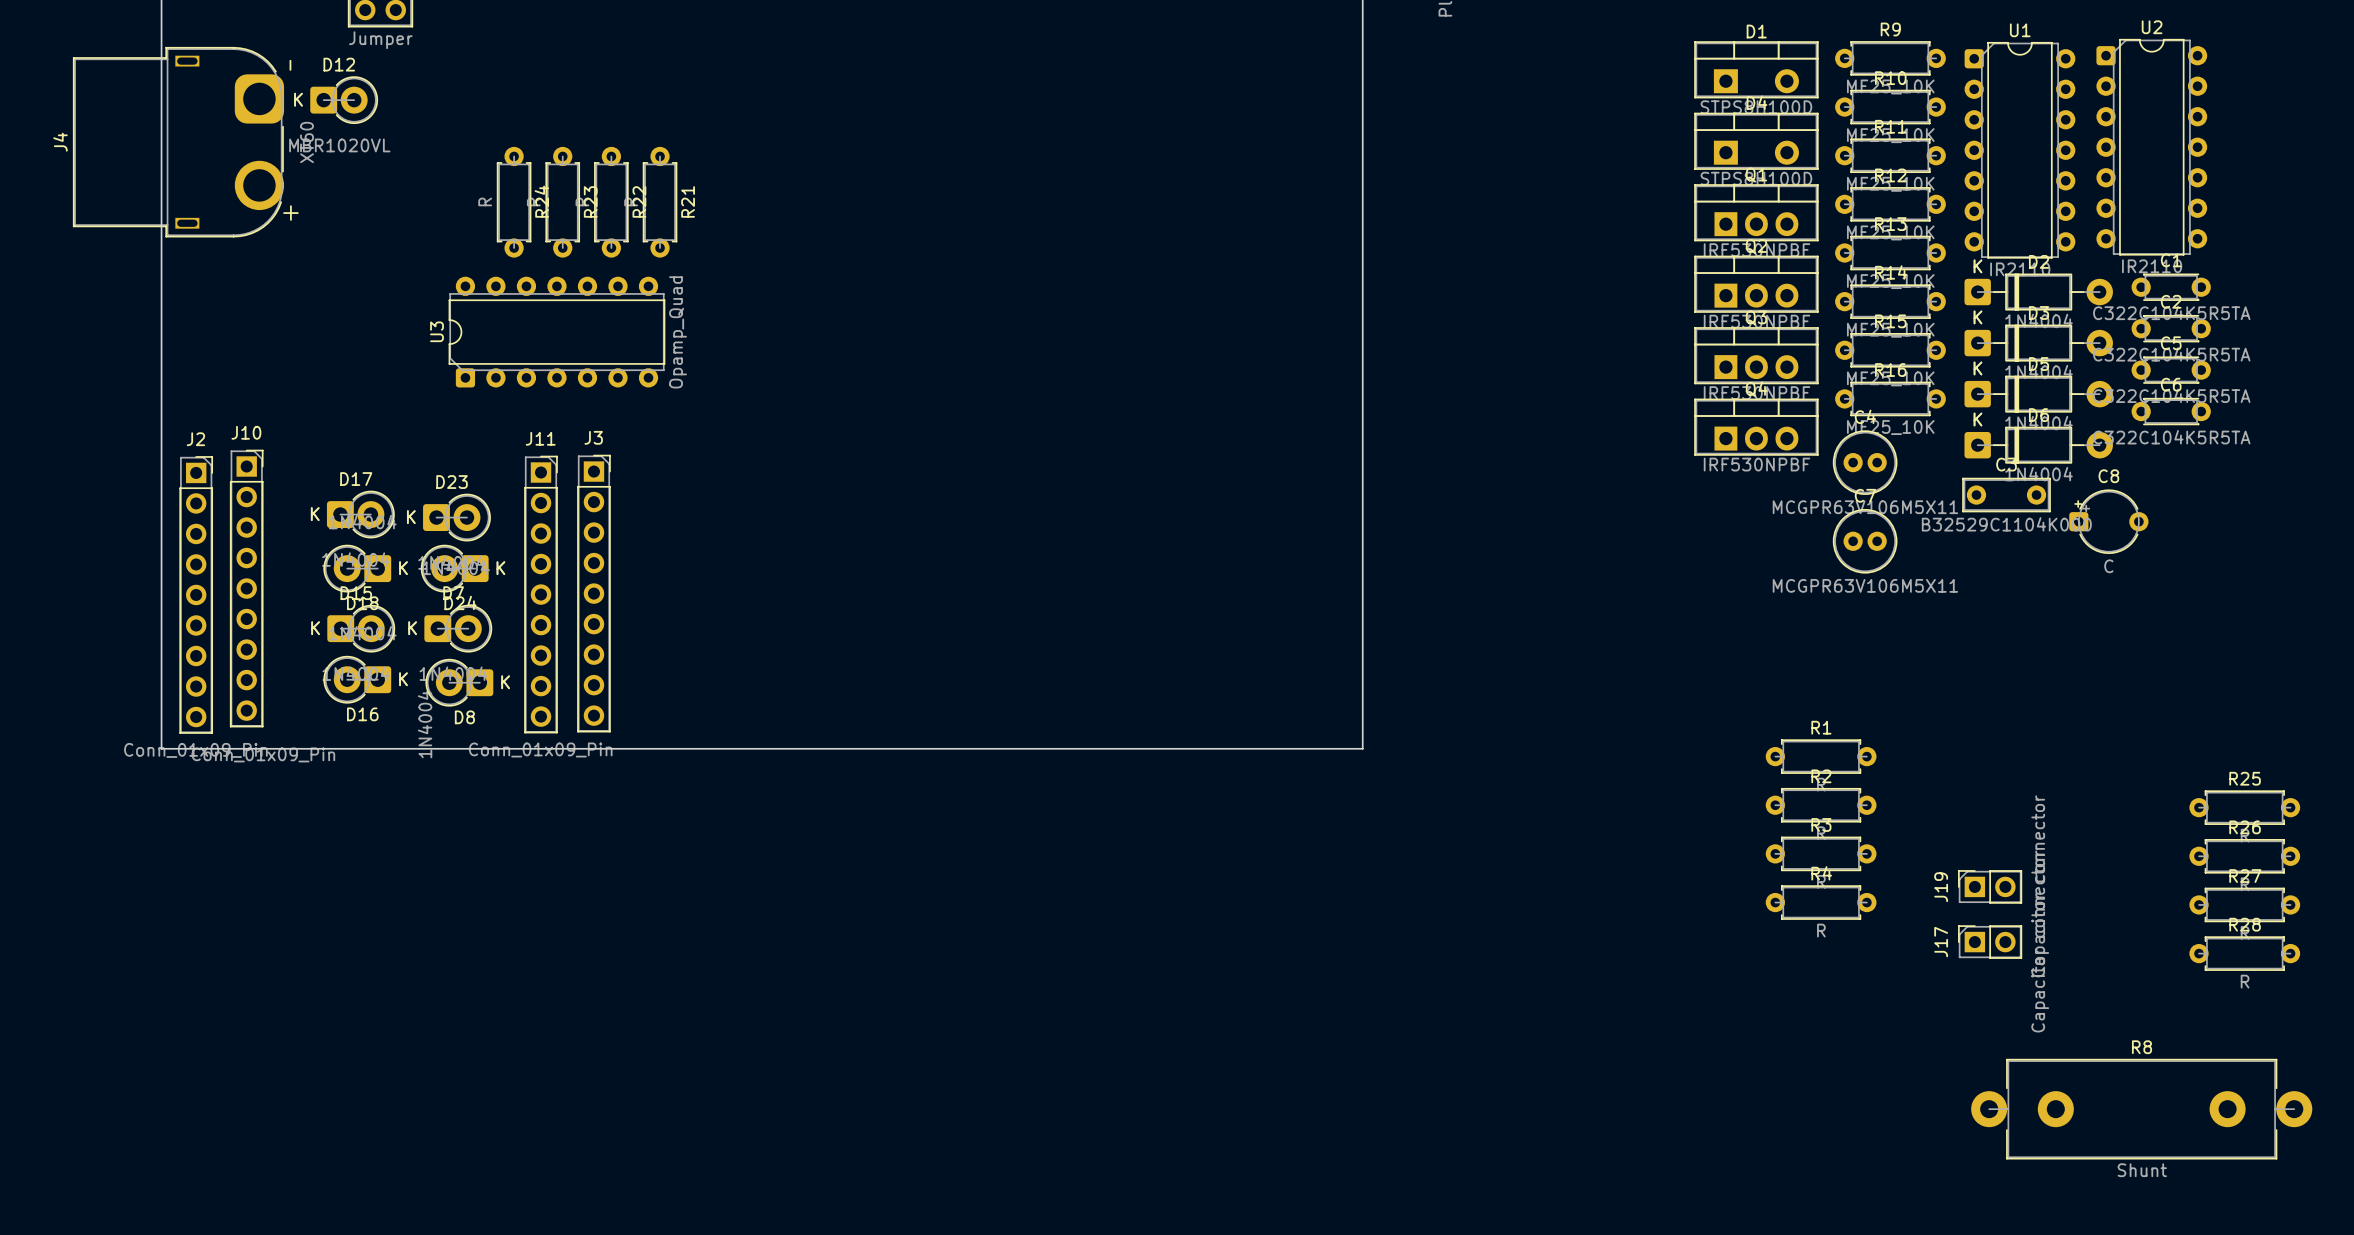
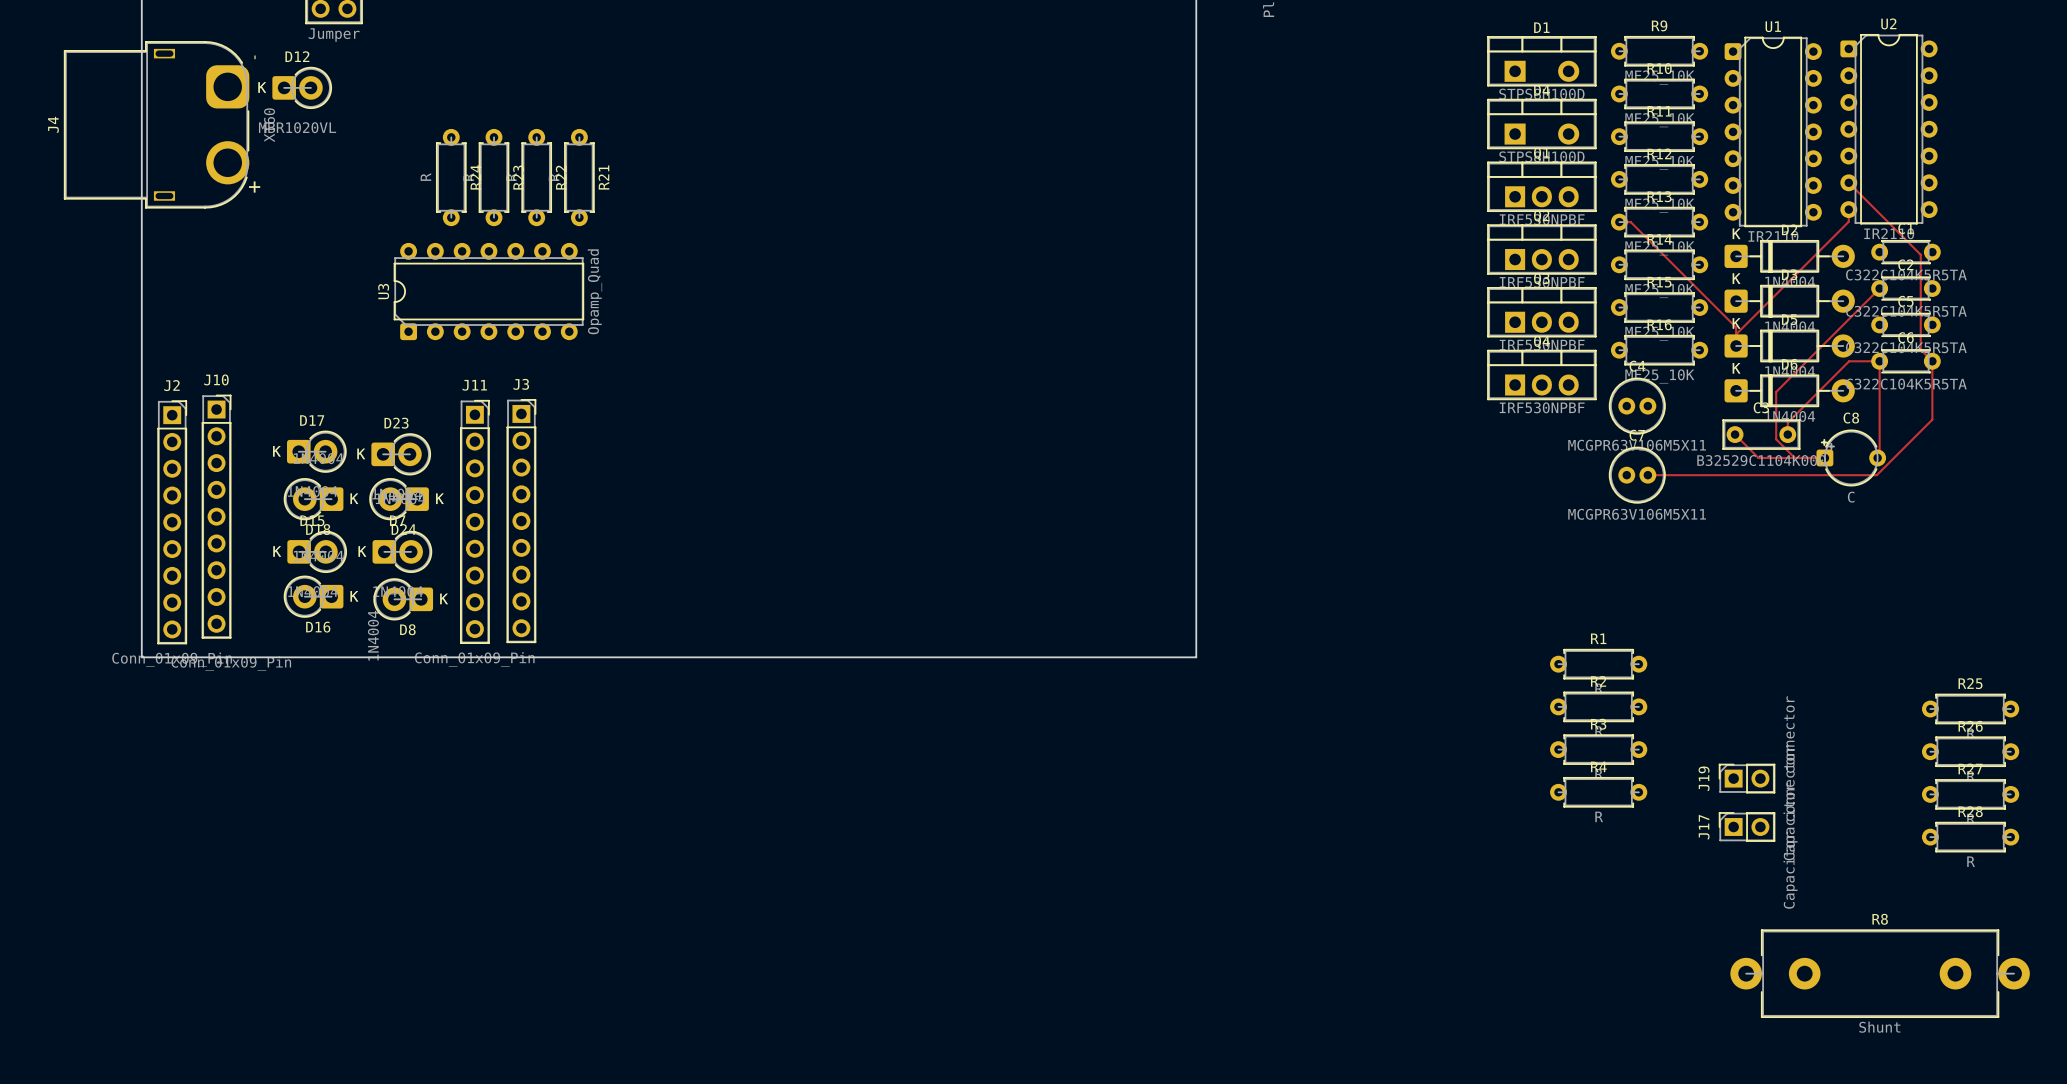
top track: none -> (1848, 182) (1920, 254) (1920, 349) (1932, 361) (1932, 419) (1876, 475) (1647, 475)
top track: none -> (1848, 209) (1848, 221) (1736, 334)
top track: none -> (1619, 222) (1630, 222) (1736, 327) (1736, 345)
top track: none -> (1879, 288) (1776, 391) (1776, 439) (1794, 457)
top track: none -> (1735, 434) (1758, 457) (1824, 457)
top track: none -> (1787, 434) (1787, 422) (1849, 361) (1879, 361) (1879, 455) (1877, 457)

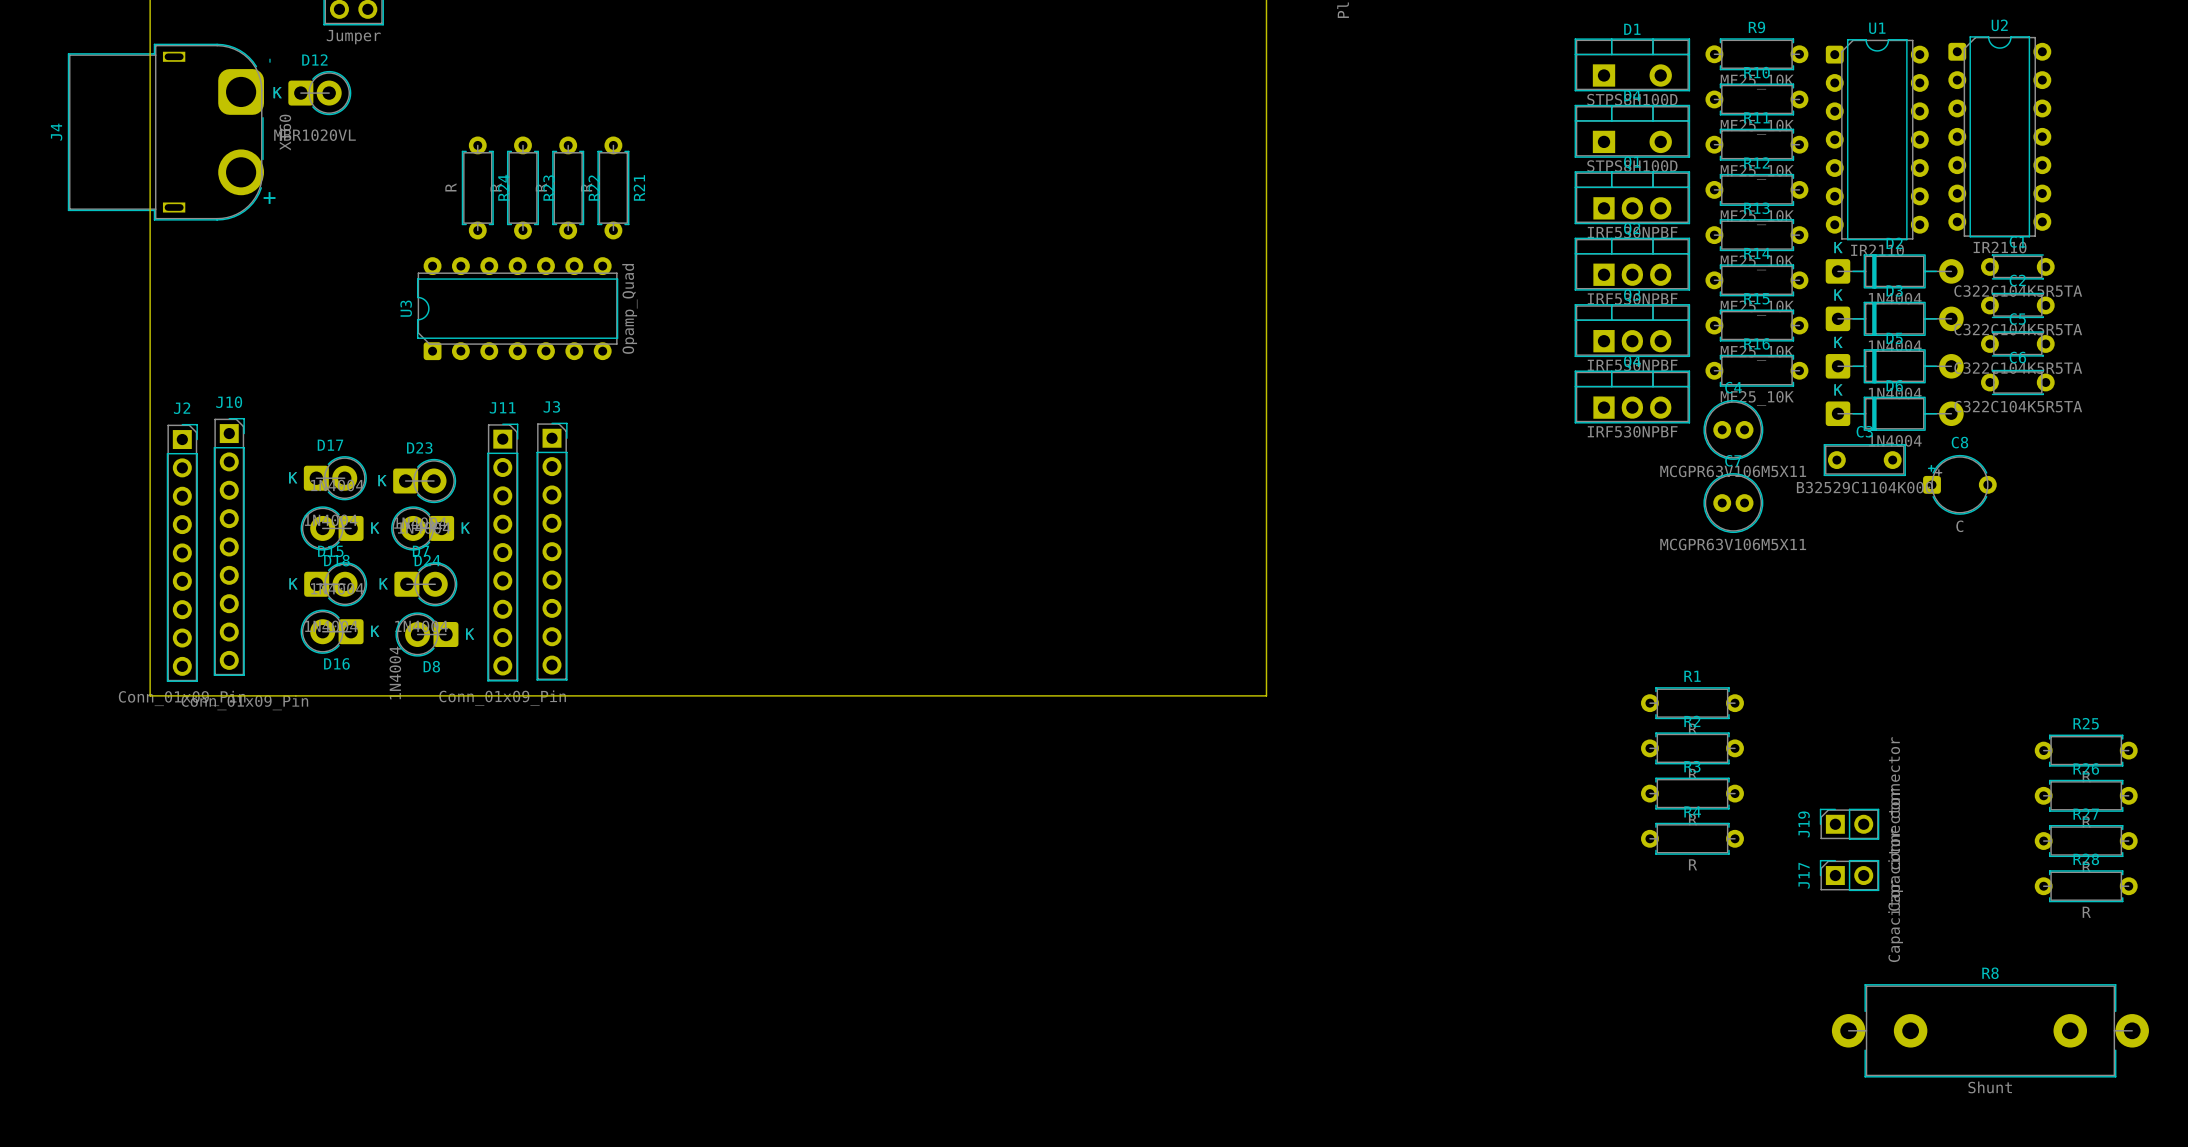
top track: (1848, 182) (1920, 254) (1920, 349) (1932, 361) (1932, 419) (1876, 475) (1647, 475) -> none
top track: (1848, 209) (1848, 221) (1736, 334) -> none
top track: (1619, 222) (1630, 222) (1736, 327) (1736, 345) -> none
top track: (1879, 288) (1776, 391) (1776, 439) (1794, 457) -> none
top track: (1735, 434) (1758, 457) (1824, 457) -> none
top track: (1787, 434) (1787, 422) (1849, 361) (1879, 361) (1879, 455) (1877, 457) -> none

